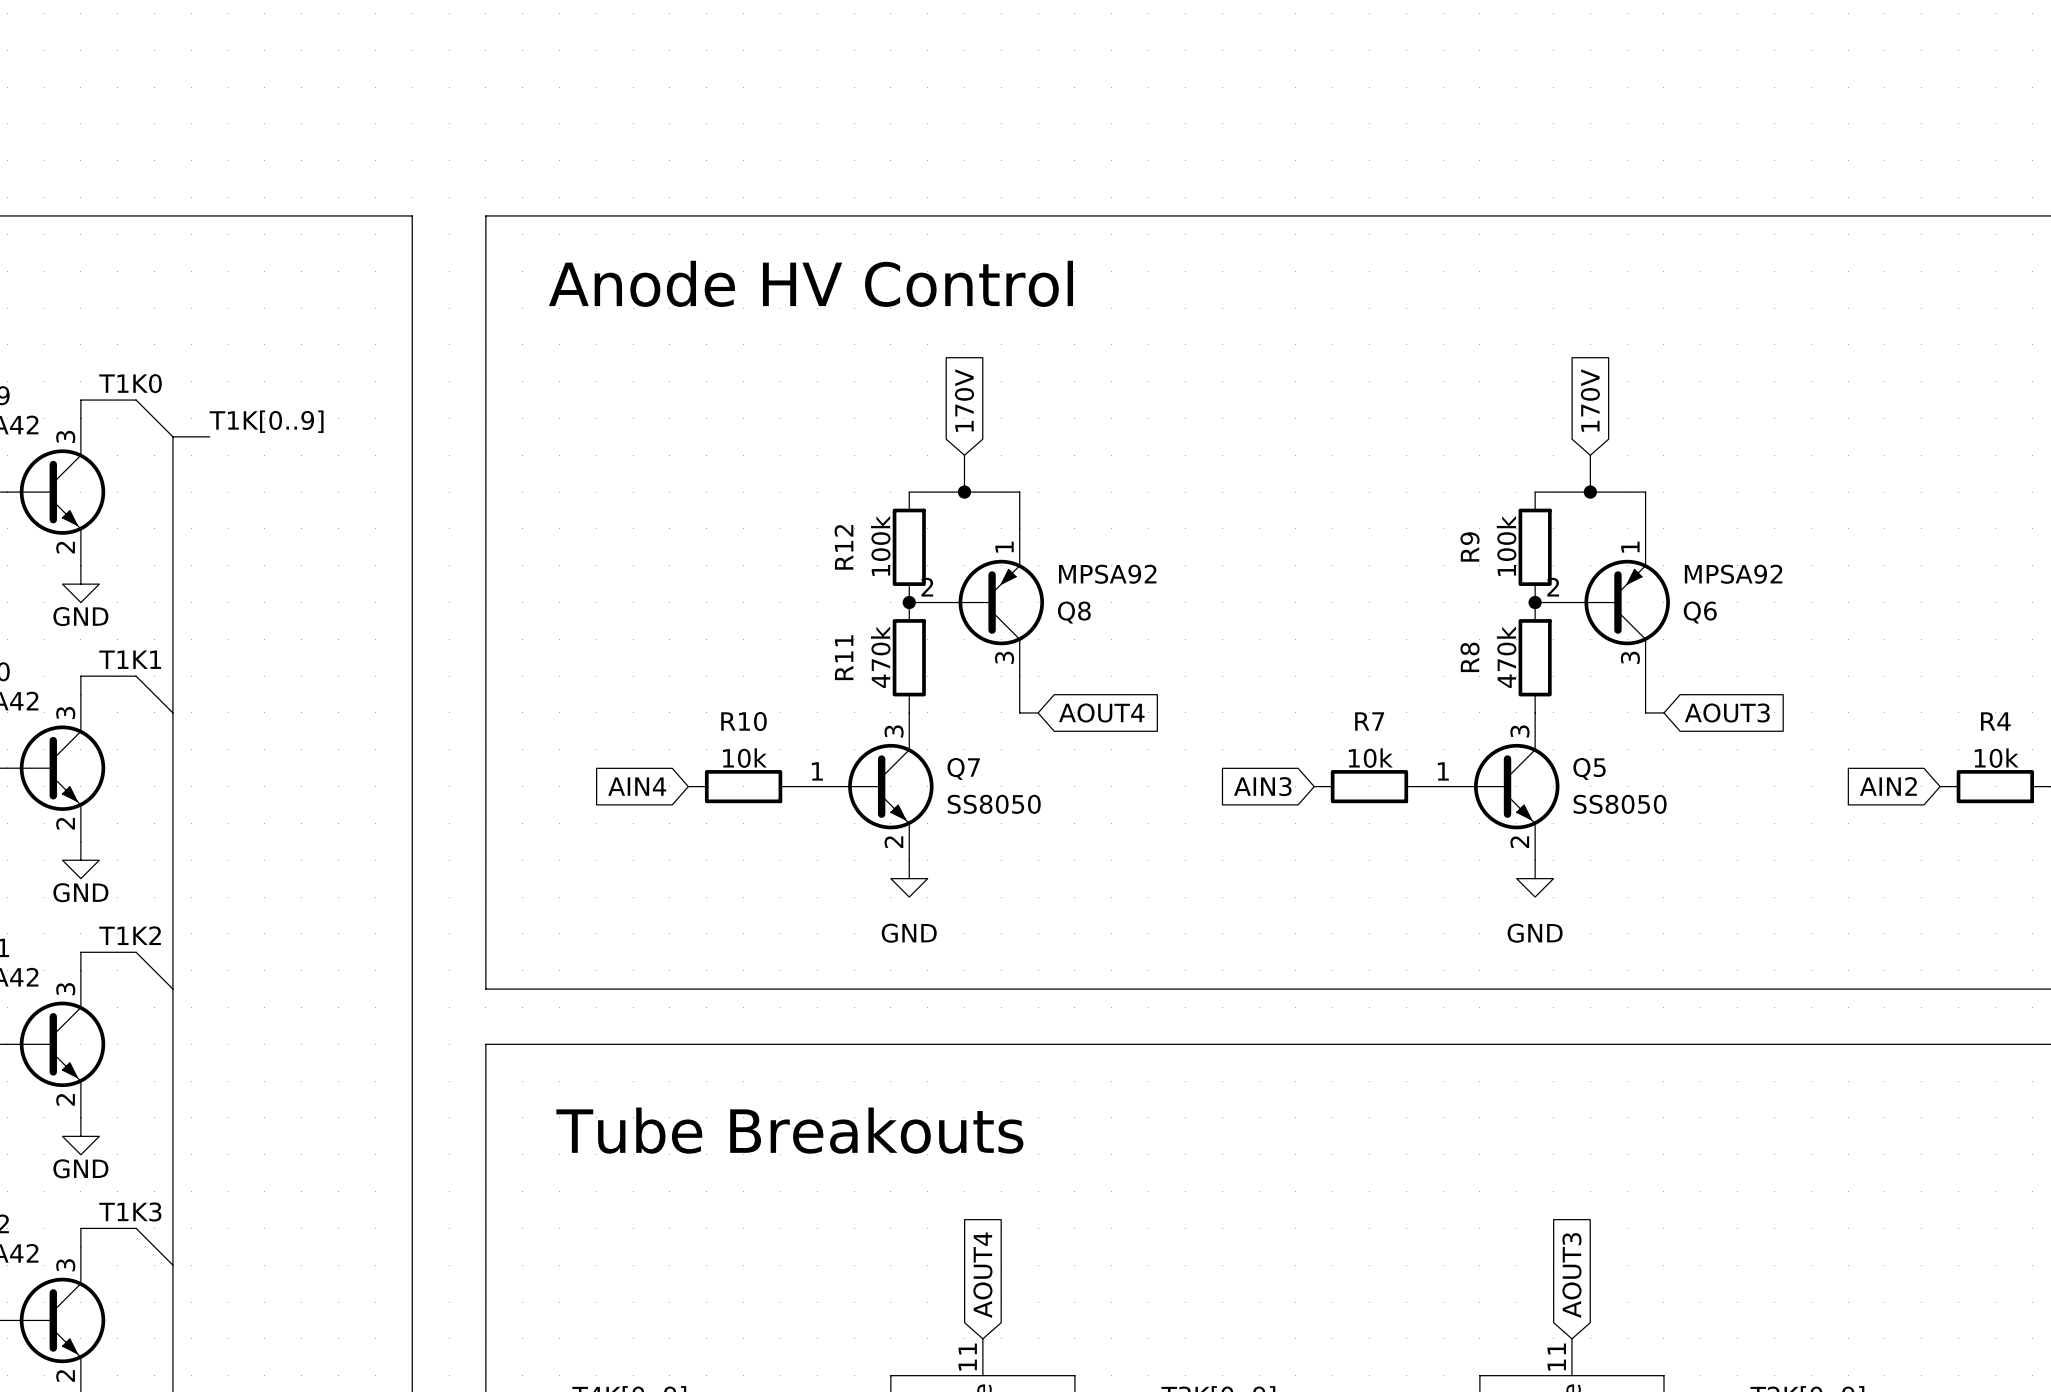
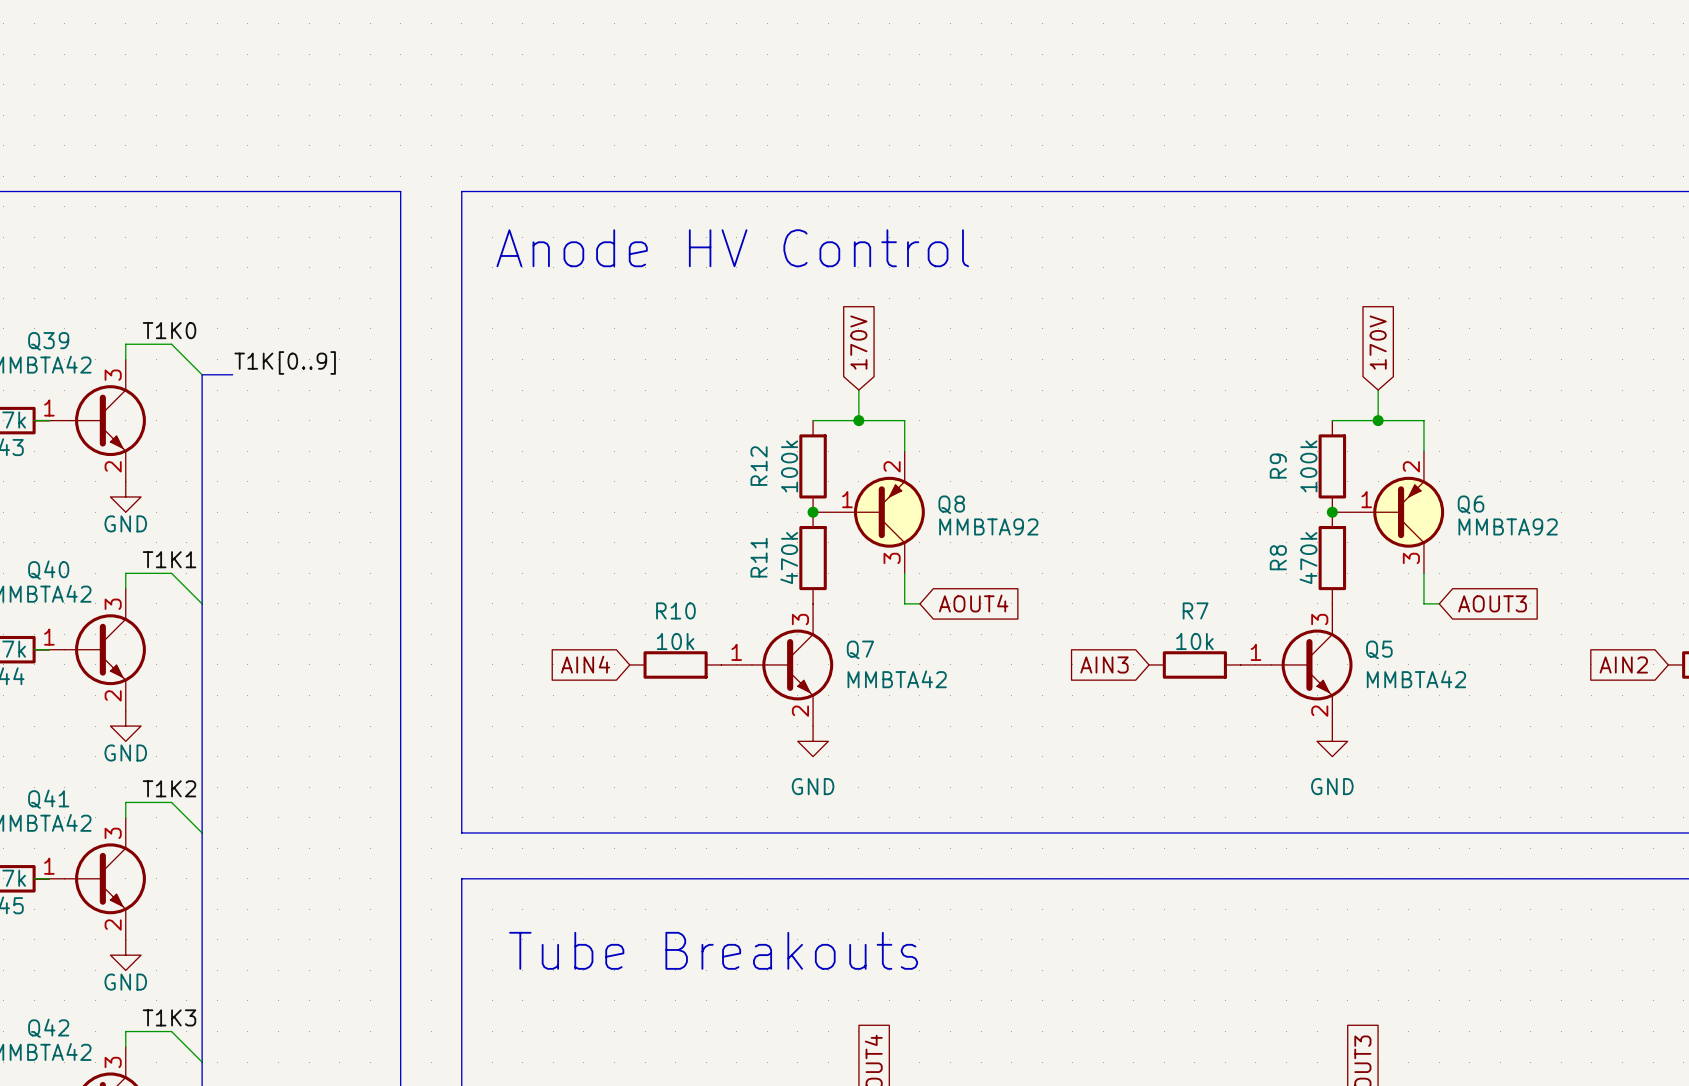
Q8 symbol: [909, 528, 1045, 677] -> [813, 451, 925, 574]
Q6 symbol: [1535, 528, 1670, 677] -> [1332, 451, 1445, 574]
Q8 value: MPSA92 (1107, 574) -> MMBTA92 (988, 526)
Q6 value: MPSA92 (1733, 574) -> MMBTA92 (1508, 526)
Q7 value: SS8050 (994, 804) -> MMBTA42 (897, 679)
Q5 value: SS8050 (1620, 804) -> MMBTA42 (1416, 679)

